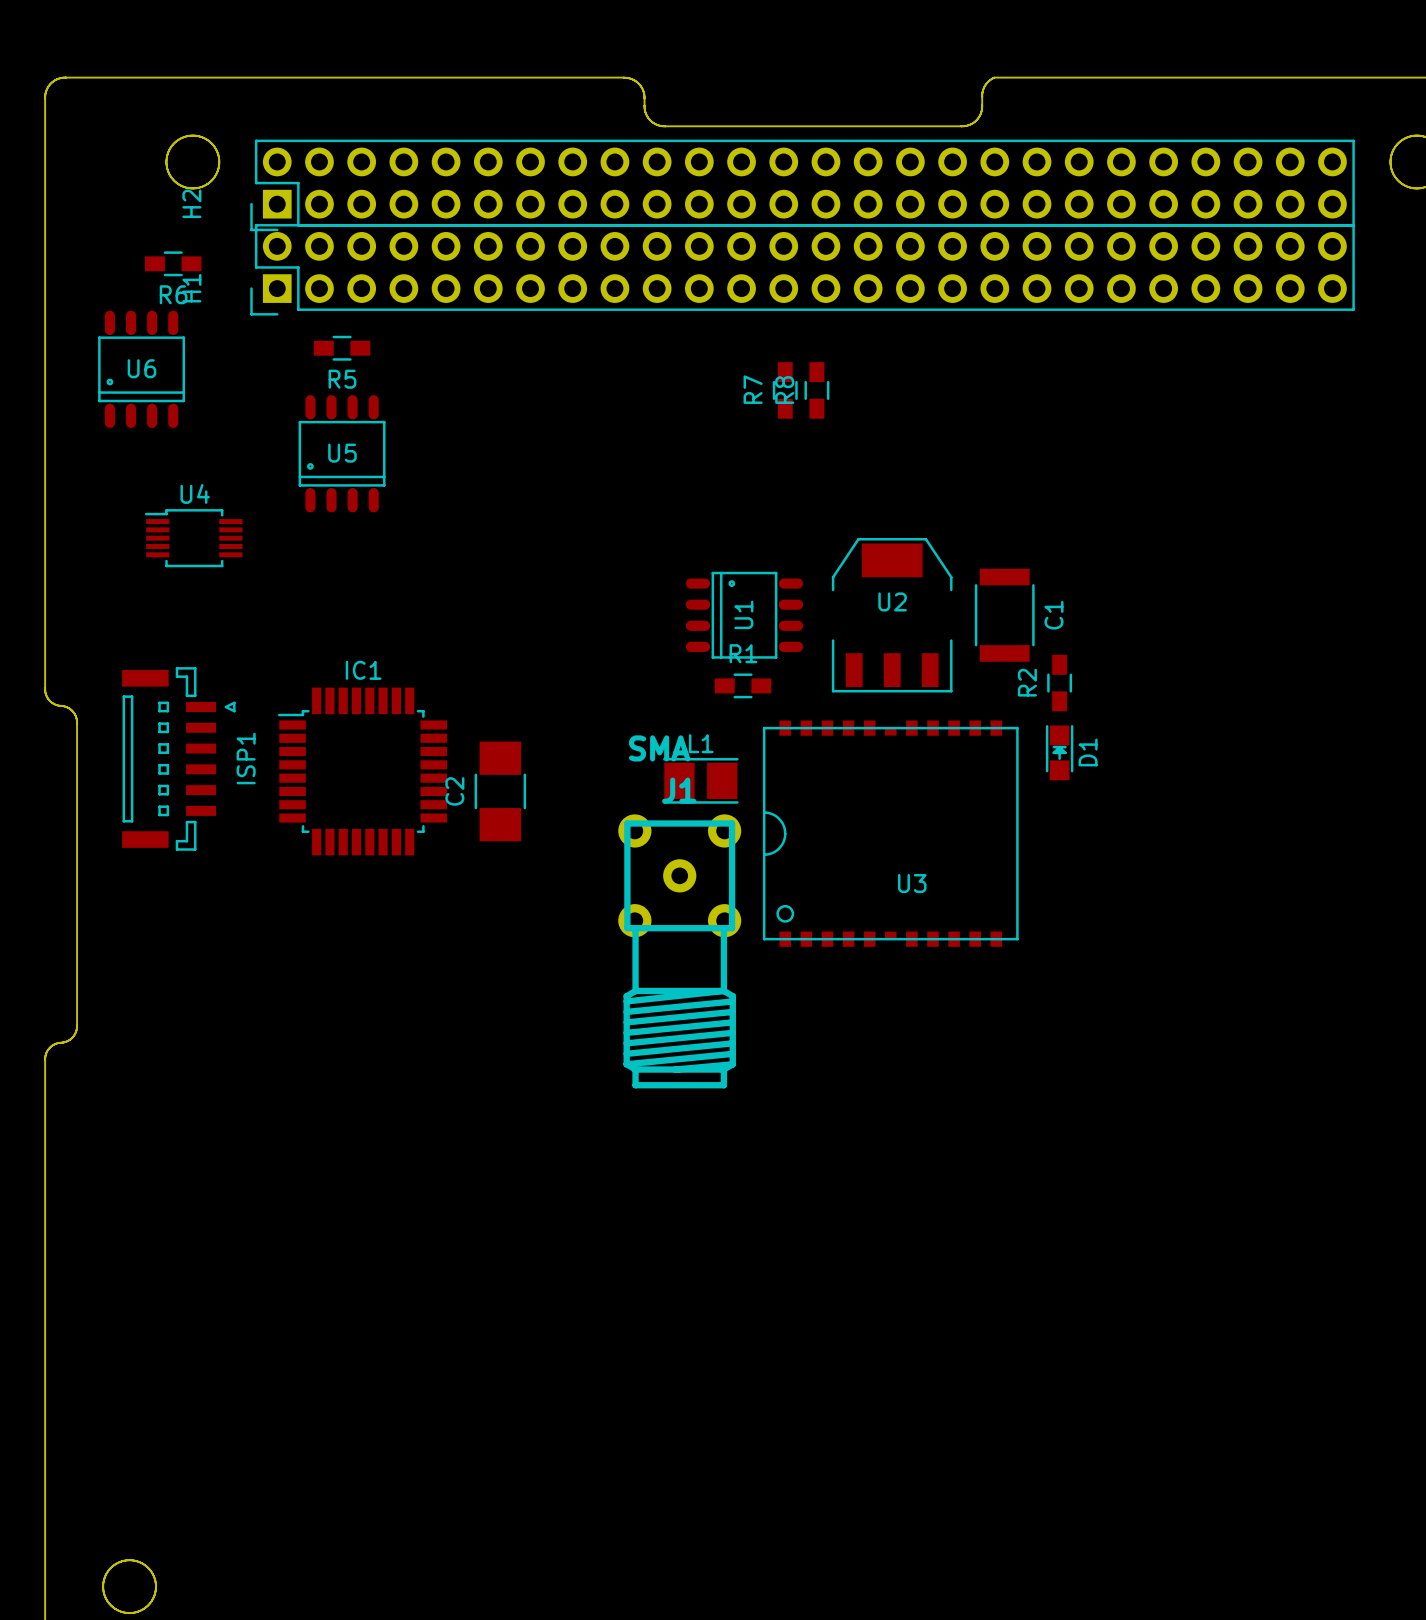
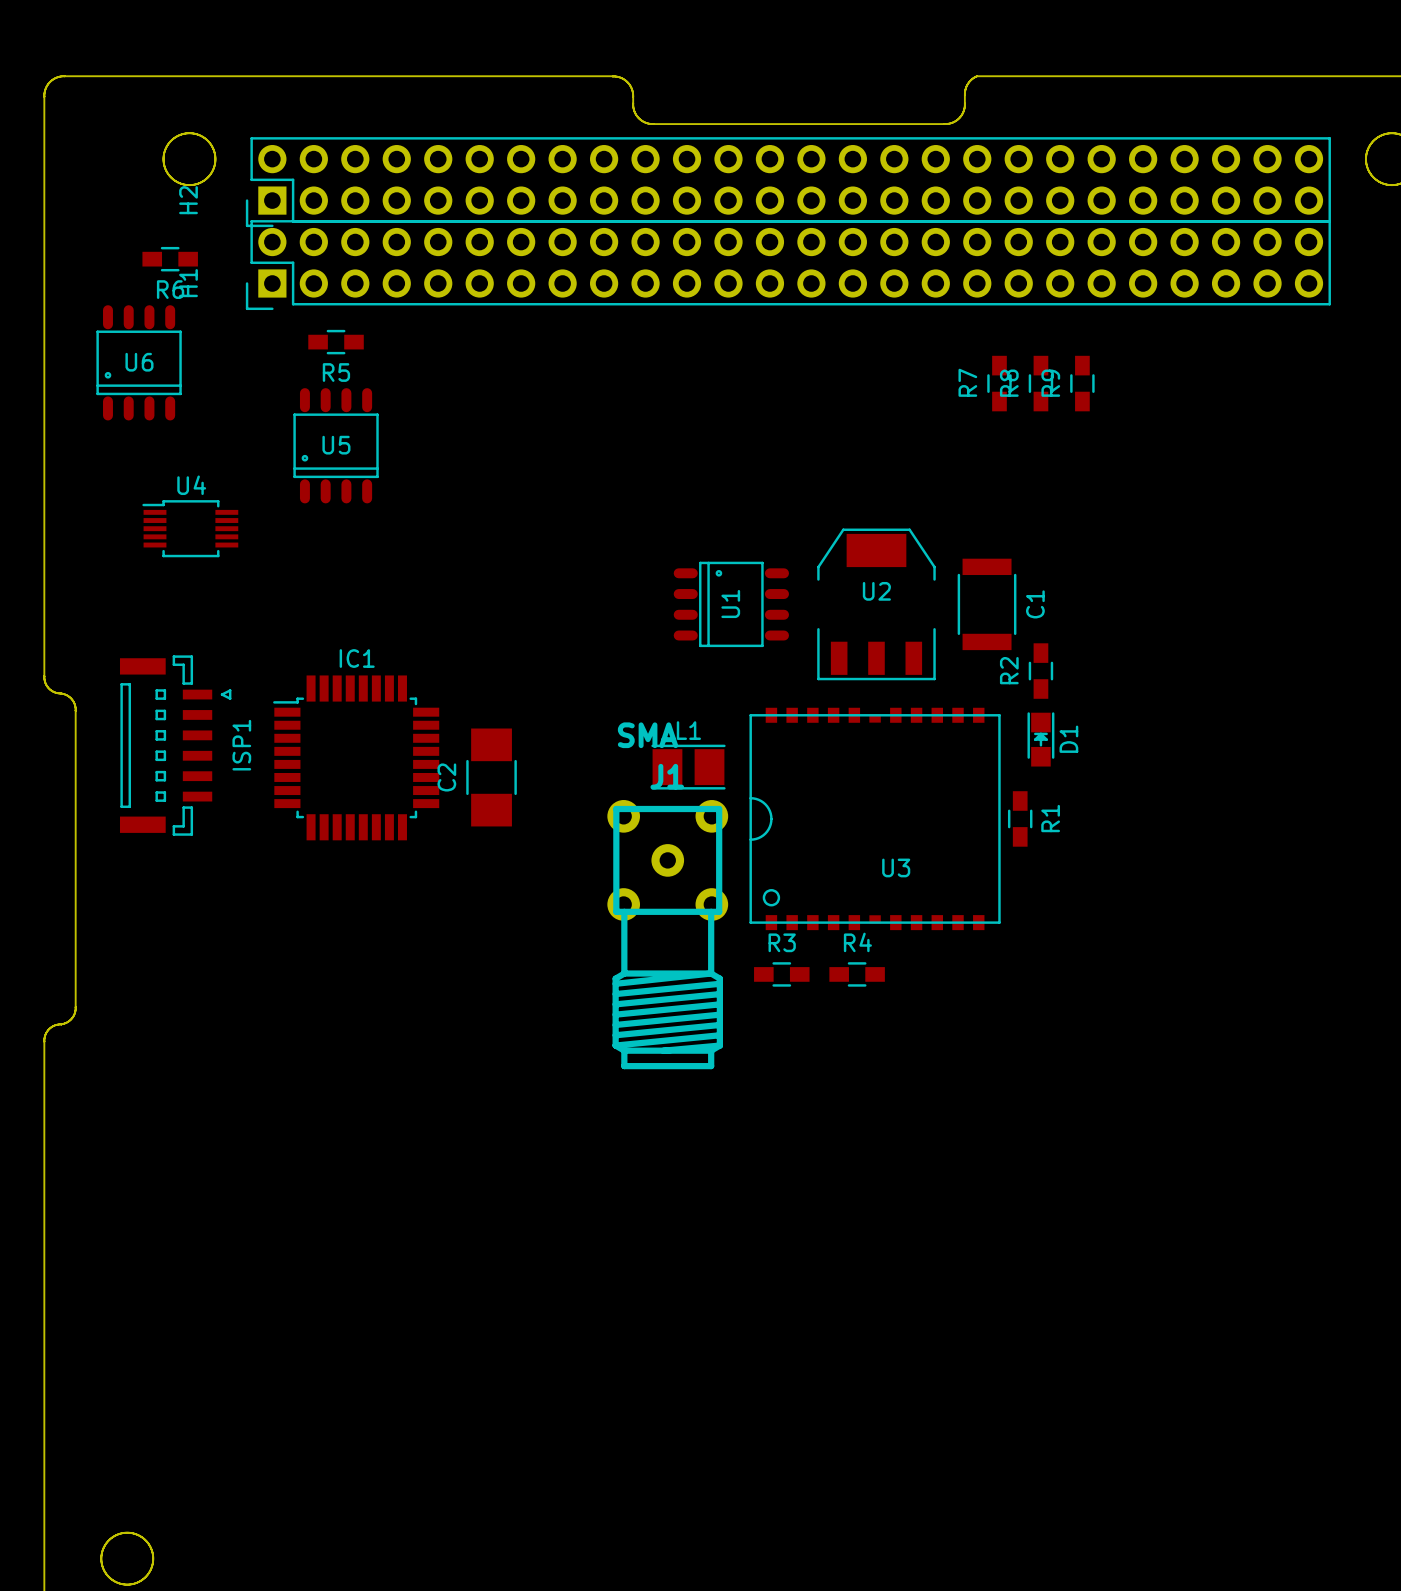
R7 position: (785, 390) -> (999, 383)
R8 position: (816, 390) -> (1040, 383)
R9: none -> (1082, 383)
R1 rotation: 0° (743, 685) -> 90° clockwise (1020, 818)
R1 position: (743, 685) -> (1020, 818)
R3: none -> (781, 974)
R4: none -> (857, 974)

